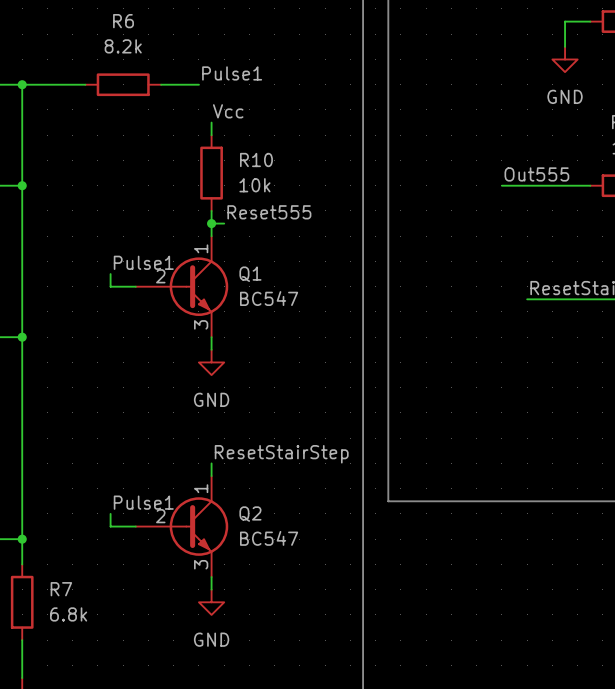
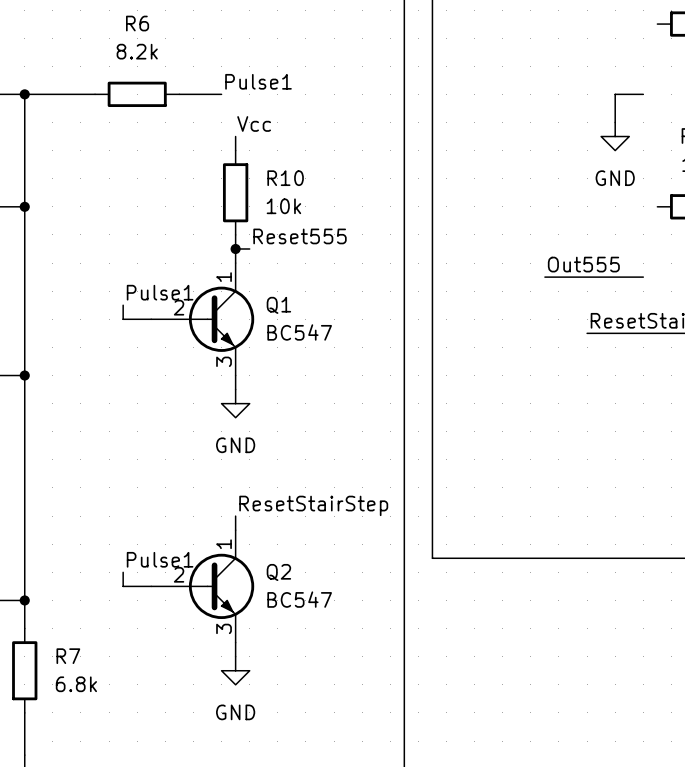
wire: (590, 21) (565, 21) (565, 46) -> (643, 94) (615, 94) (615, 122)
power symbol: GND (565, 59) -> none
power symbol: none -> GND (615, 136)
label position: Out555 (536, 174) -> Out555 (583, 264)
wire: (501, 185) (590, 185) -> (544, 277) (643, 277)

